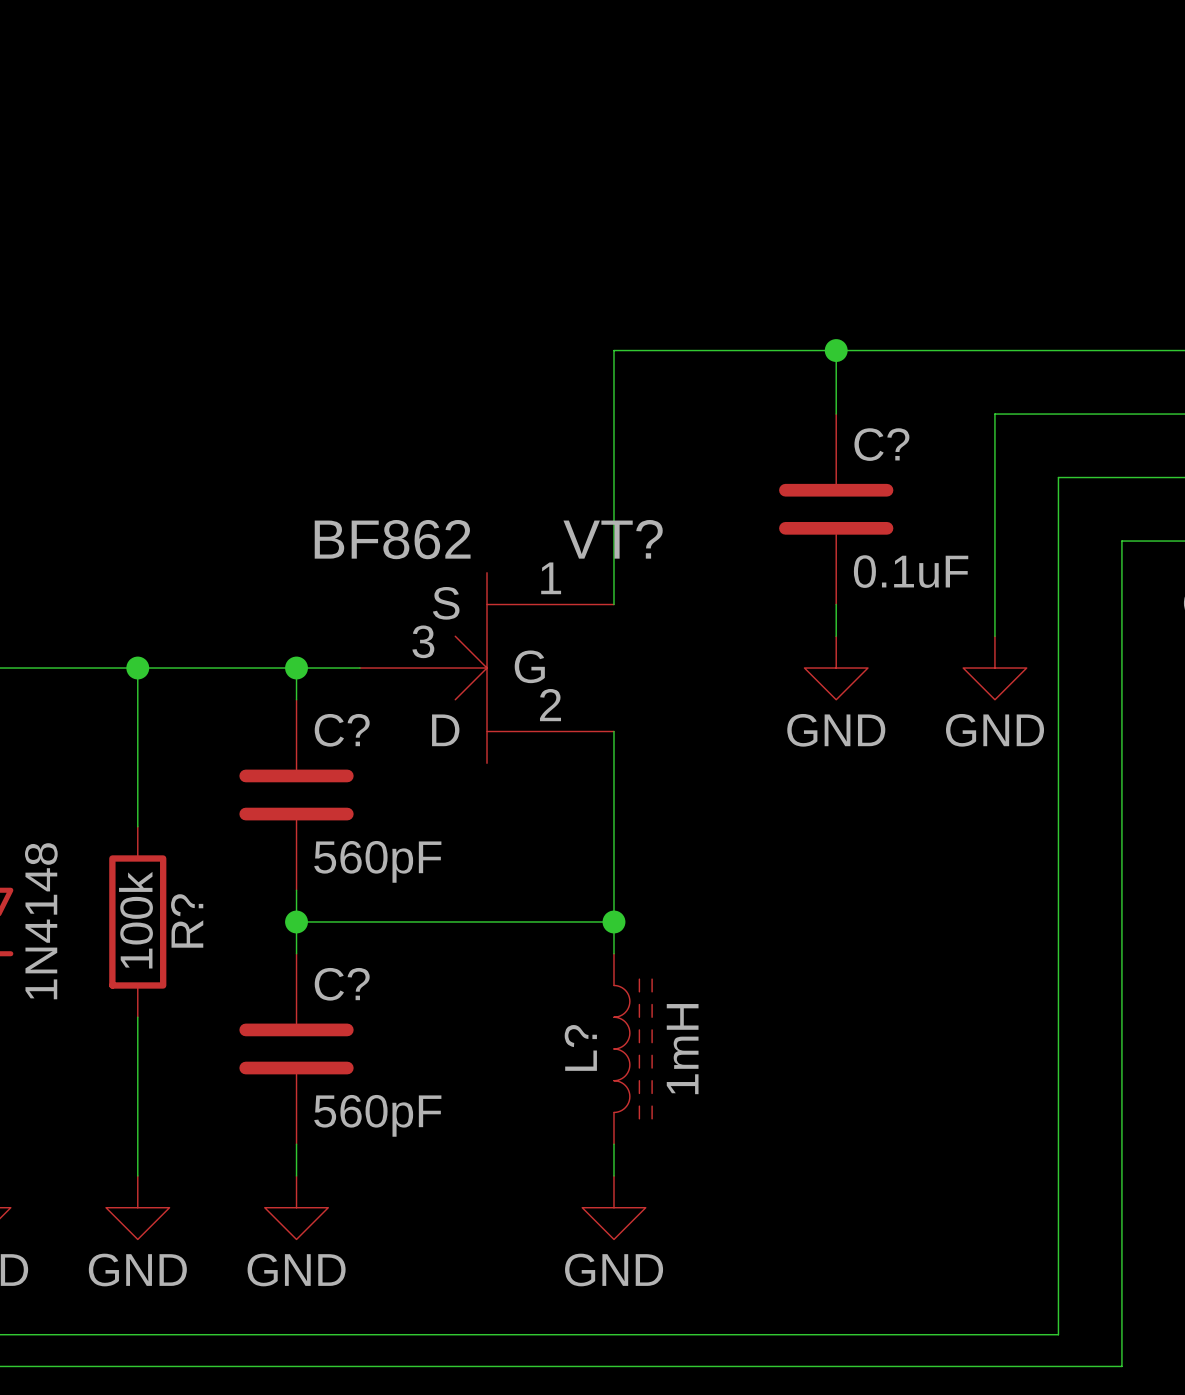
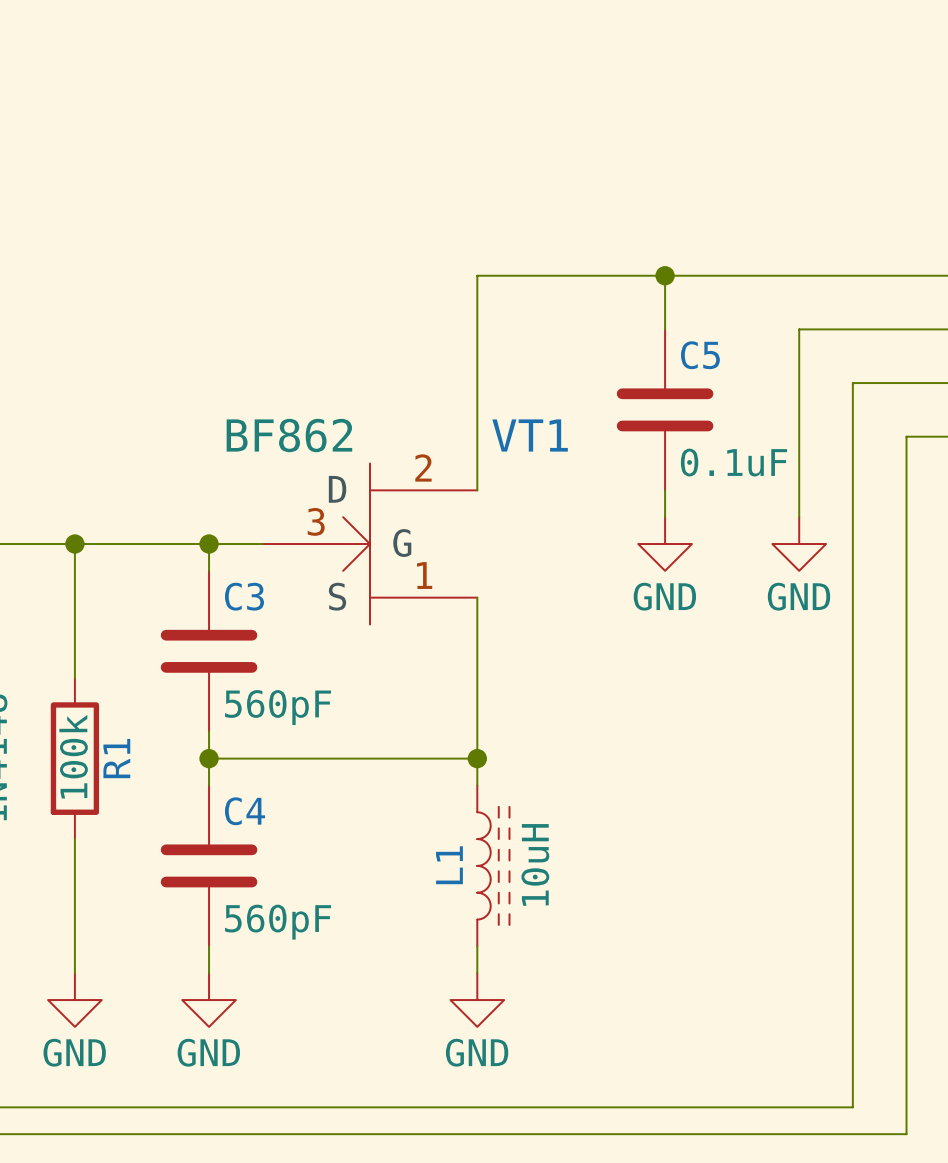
C? name: C? (881, 444) -> C5 (700, 355)
VT? name: VT? (613, 539) -> VT1 (530, 435)
VT? flip: as is (471, 668) -> up-down (356, 544)
C? name: C? (342, 730) -> C3 (244, 596)
R? name: R? (187, 920) -> R1 (116, 758)
C? name: C? (342, 984) -> C4 (244, 811)
L? name: L? (580, 1047) -> L1 (449, 865)
L? value: 1mH (682, 1049) -> 10uH (535, 864)

